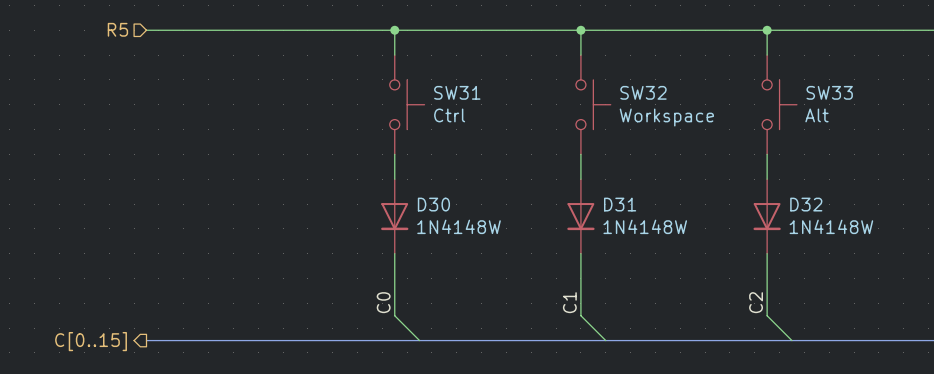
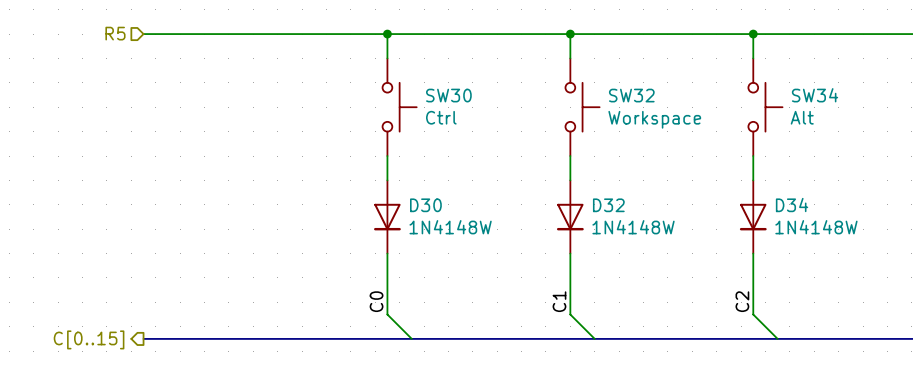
SW31 name: SW31 (457, 92) -> SW30 (448, 95)
SW33 name: SW33 (829, 92) -> SW34 (815, 95)
D31 name: D31 (620, 204) -> D32 (608, 205)
D32 name: D32 (806, 204) -> D34 (792, 205)

